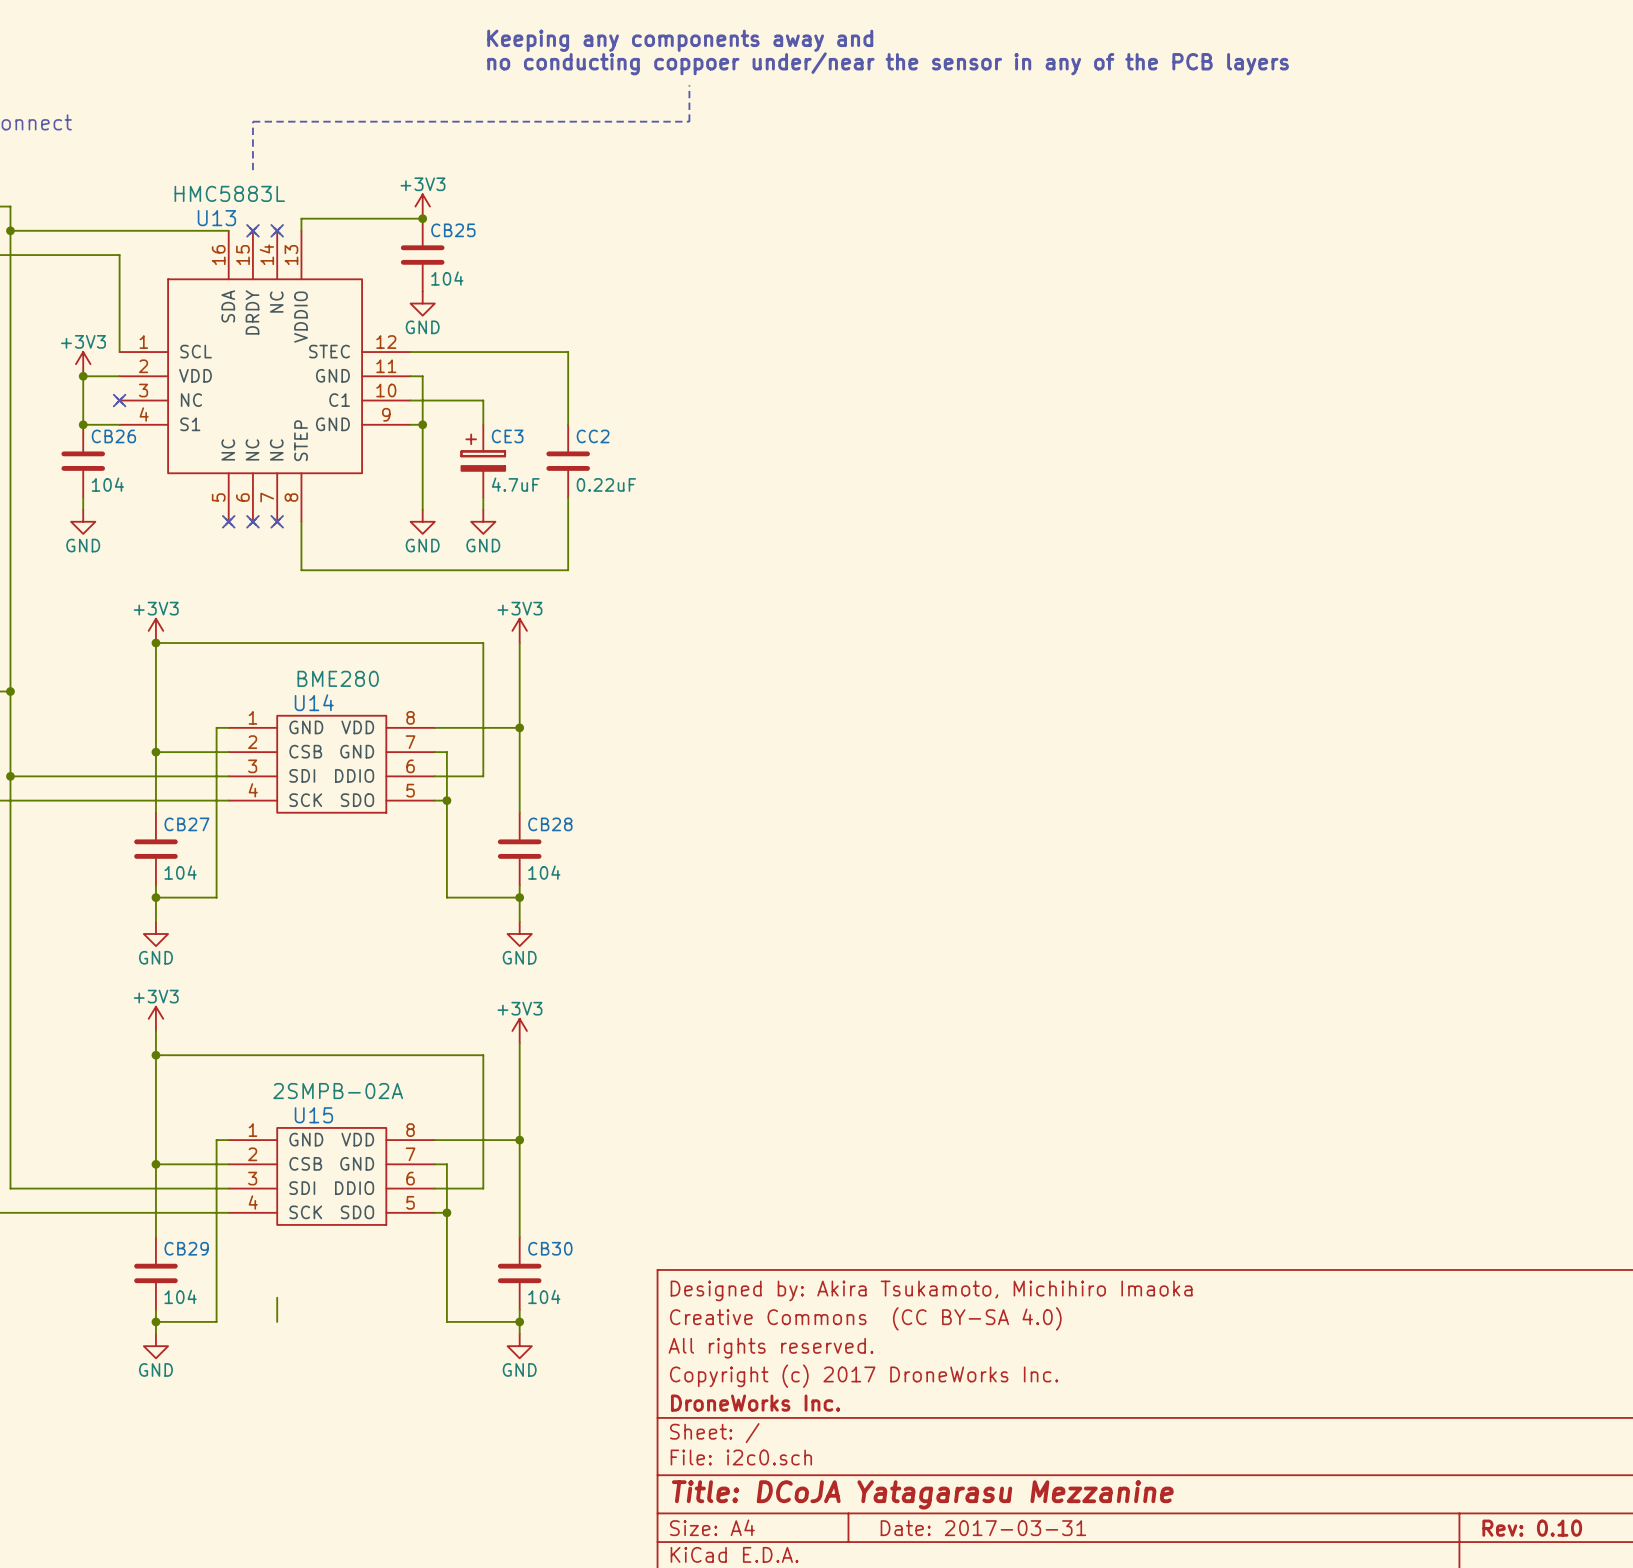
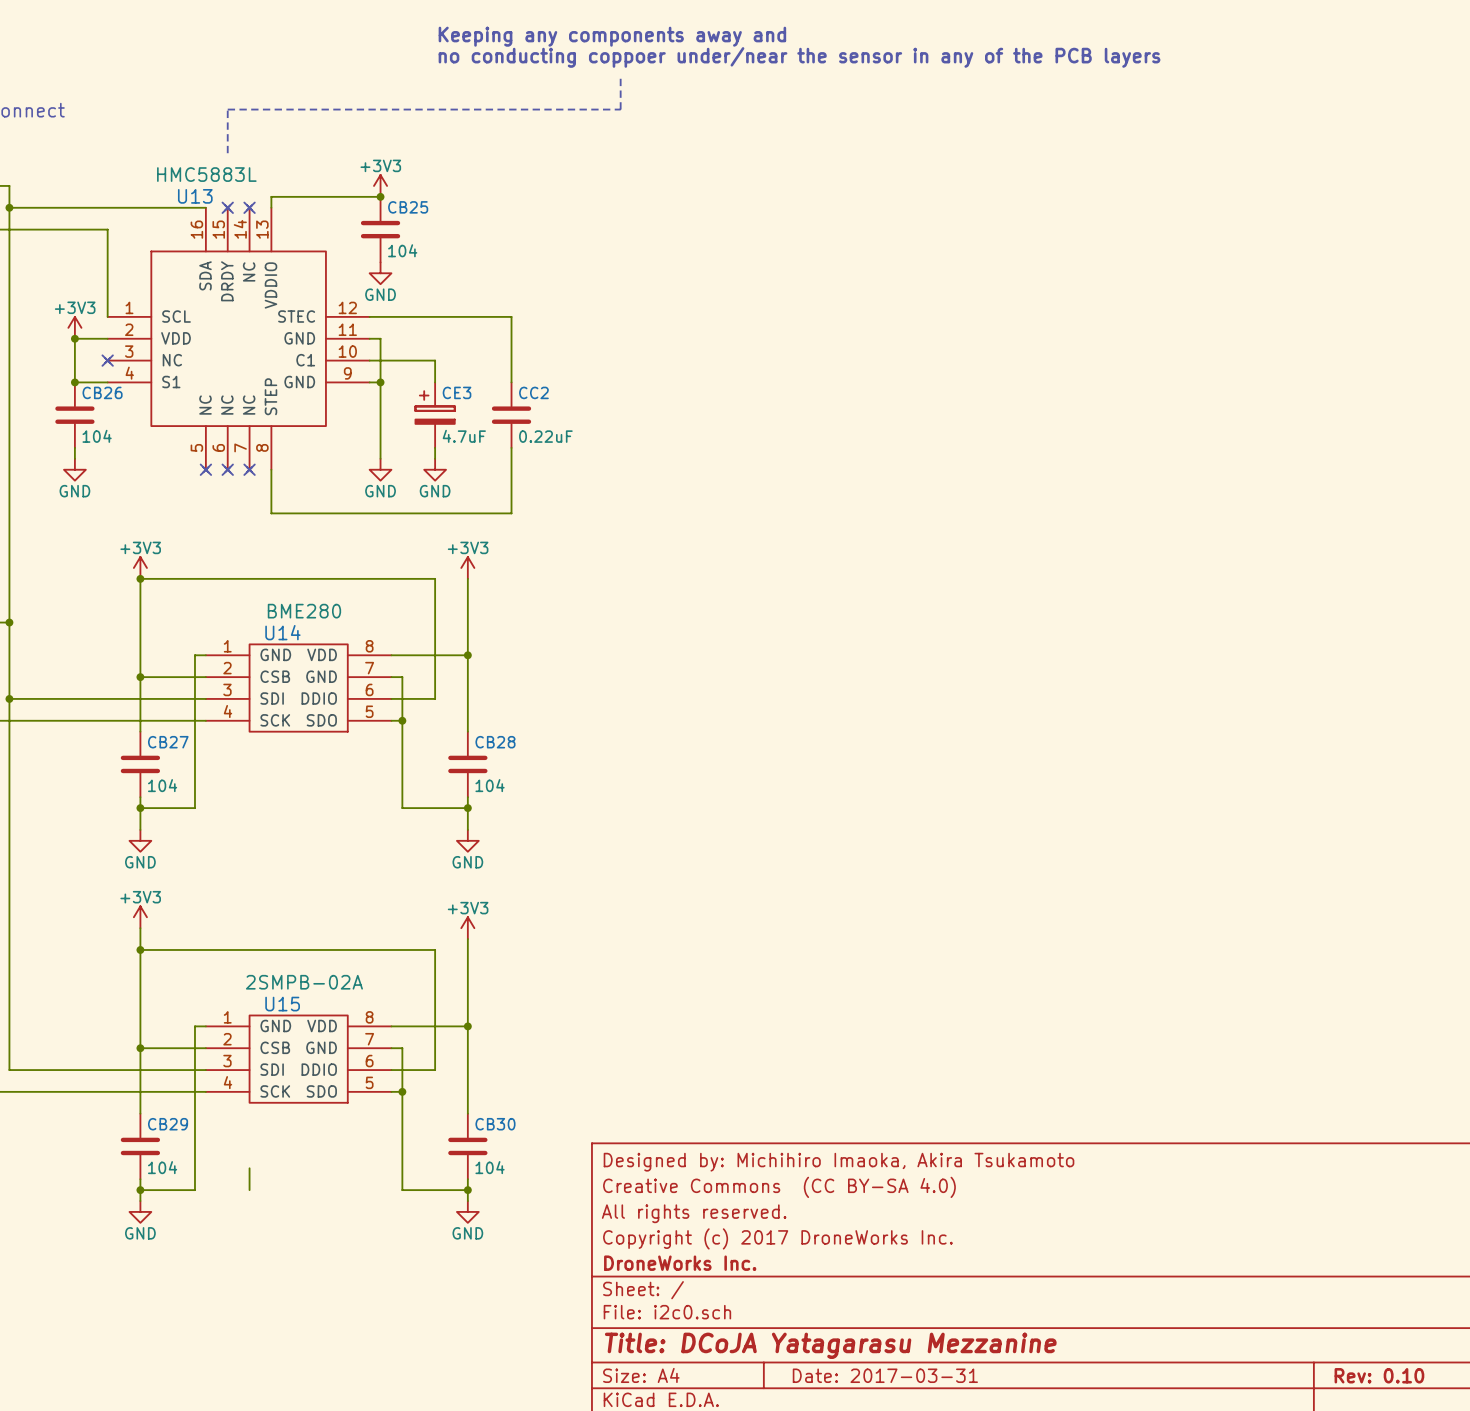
title block: Designed by: Akira Tsukamoto, Michihiro Imaoka (931, 1290) -> Designed by: Michihiro Imaoka, Akira Tsukamoto (839, 1162)

